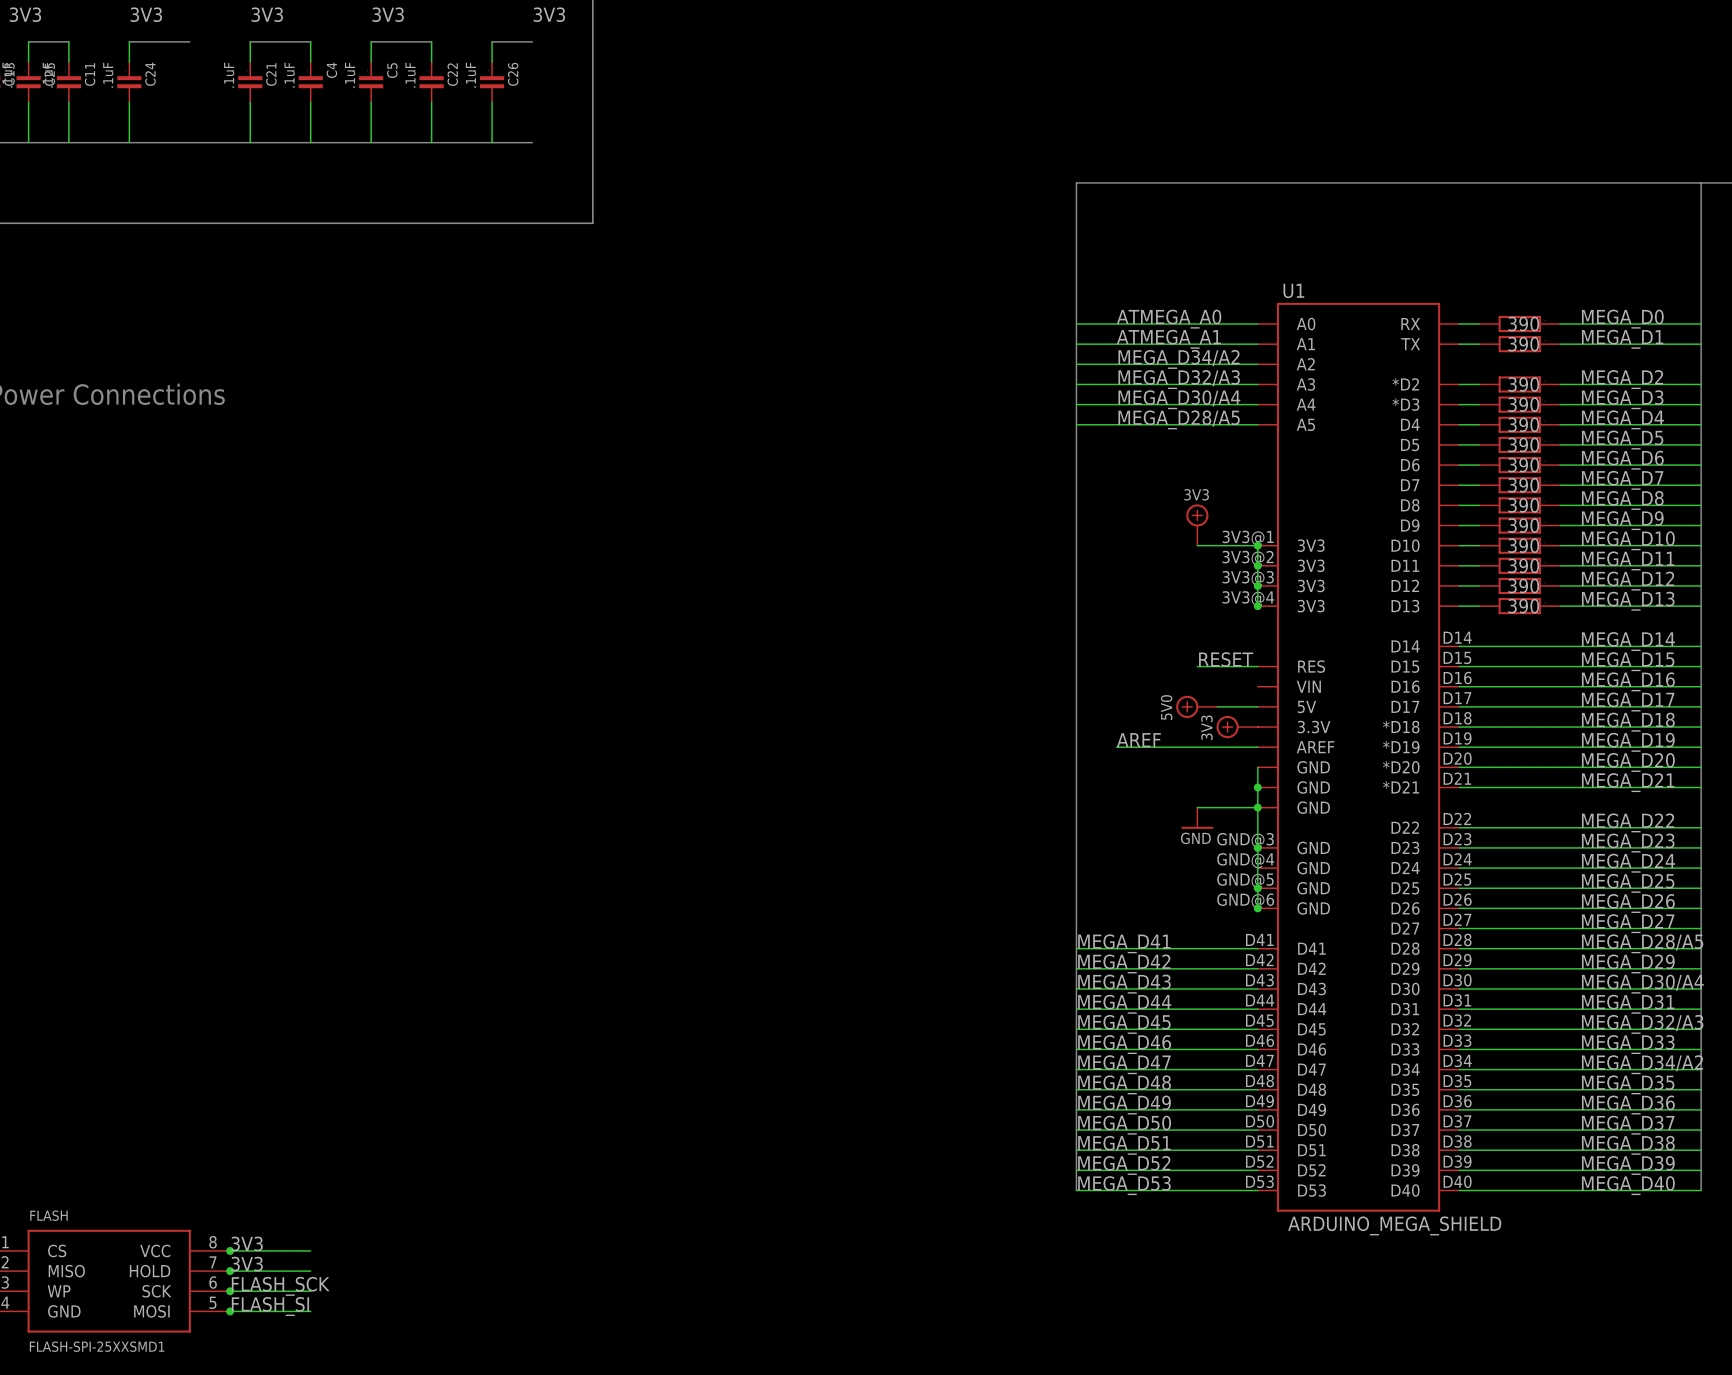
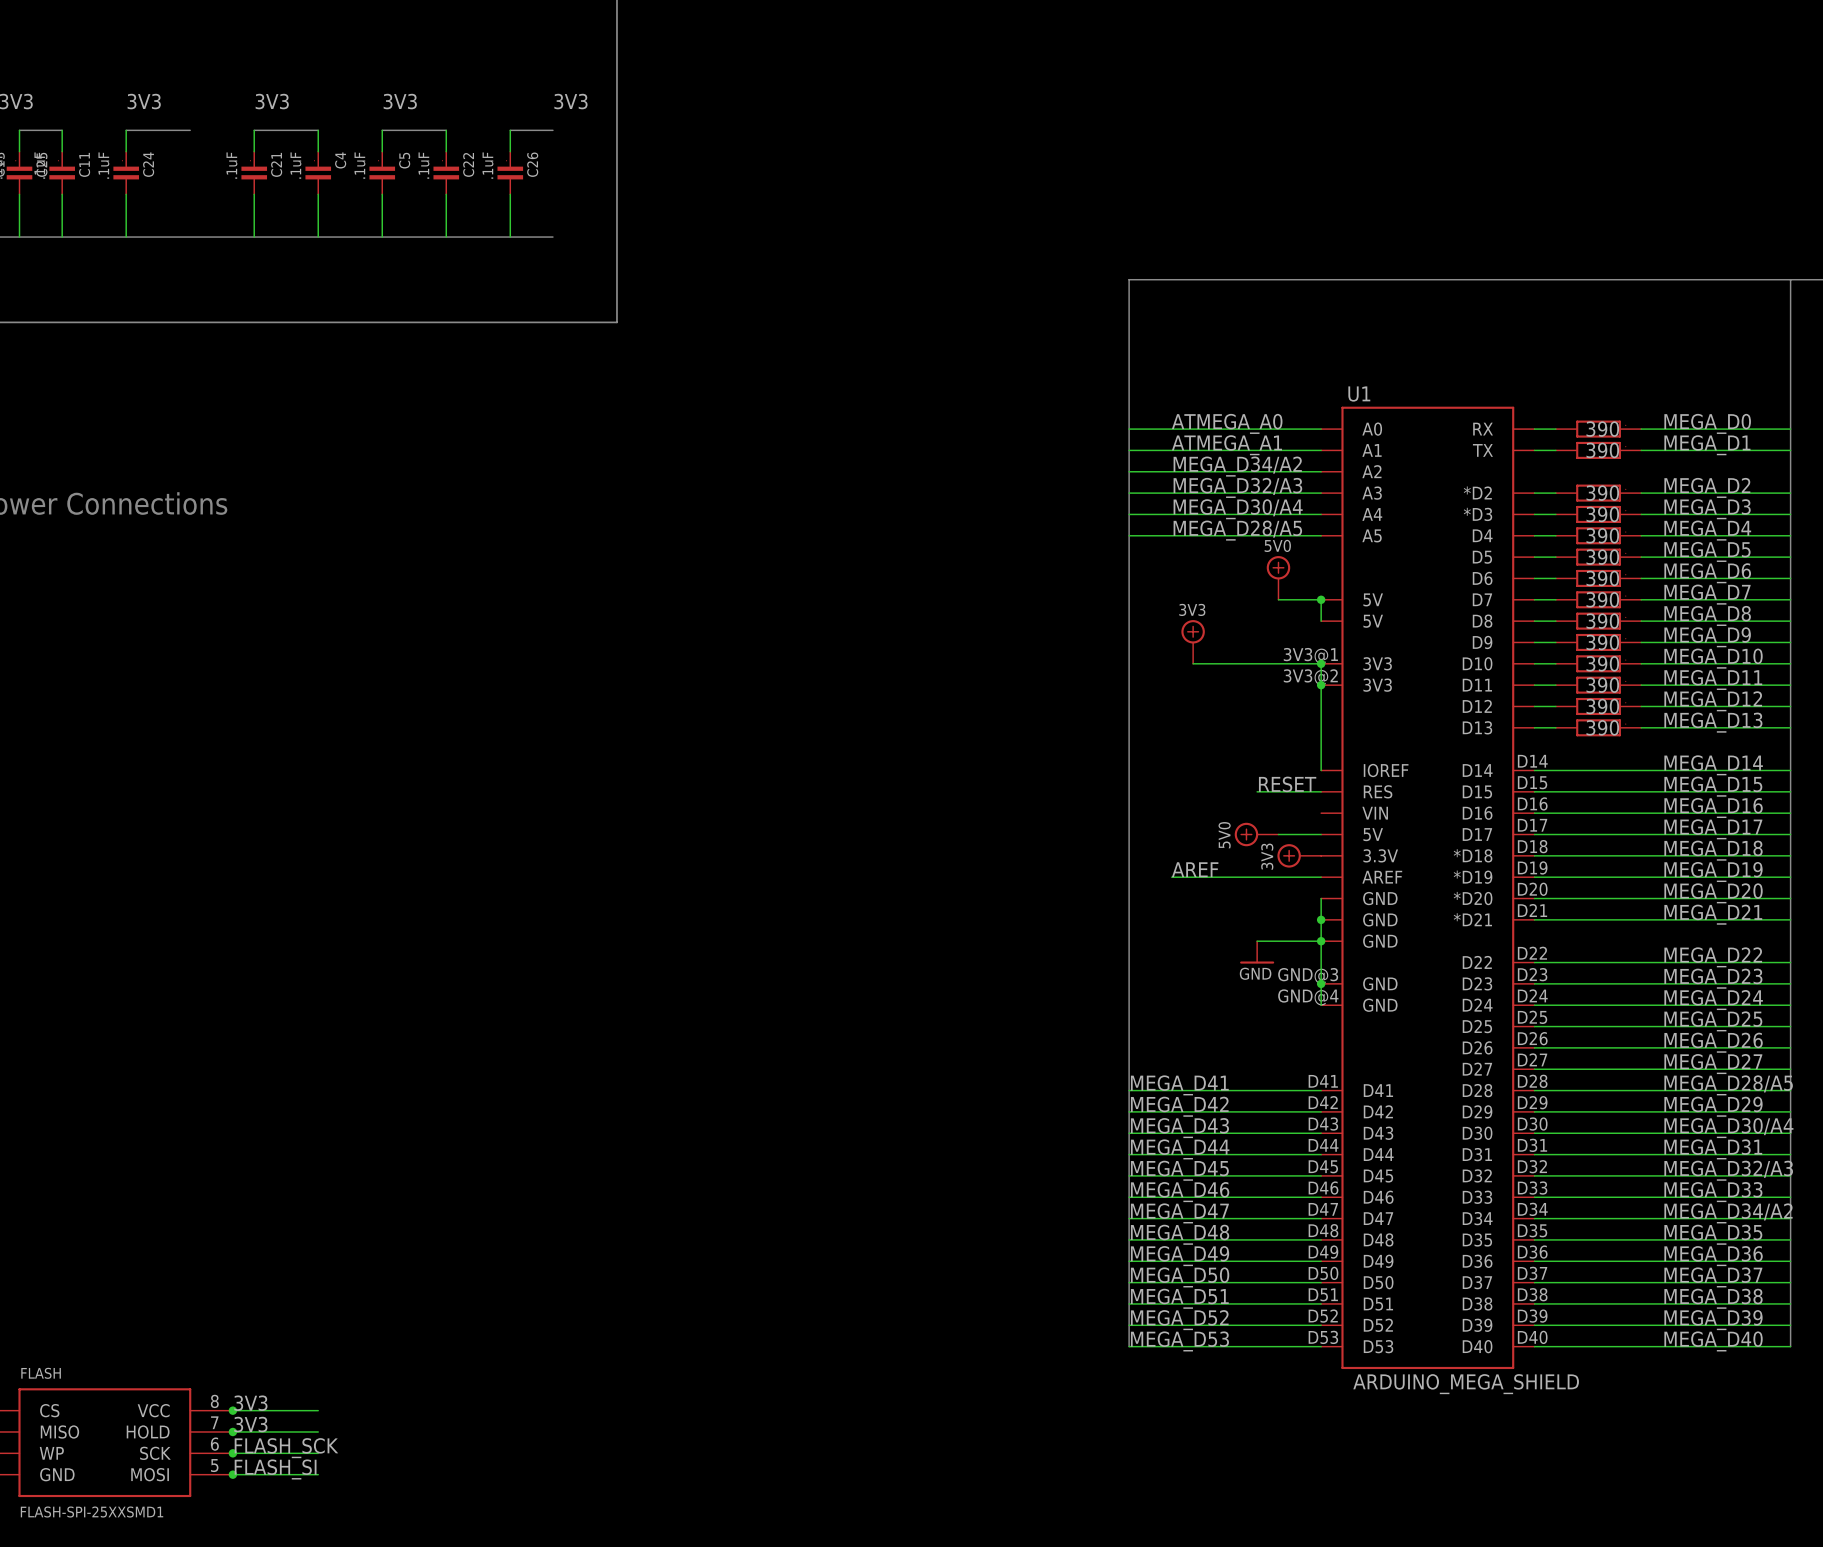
U1 symbol: [1257, 302, 1460, 1212] -> [1321, 406, 1535, 1370]
power symbol: none -> 5V0 (1278, 577)
wire: none -> (1278, 599) (1321, 599) (1321, 621)
junction: none -> (1321, 599)
power symbol position: 3V3 (1197, 525) -> 3V3 (1193, 641)
wire: none -> (1193, 663) (1257, 663)
junction: (1257, 585) -> none
wire: none -> (1321, 727) (1321, 770)
junction: (1257, 606) -> none
wire: (1257, 868) (1257, 908) -> none
junction: (1257, 888) -> none
junction: (1257, 908) -> none

